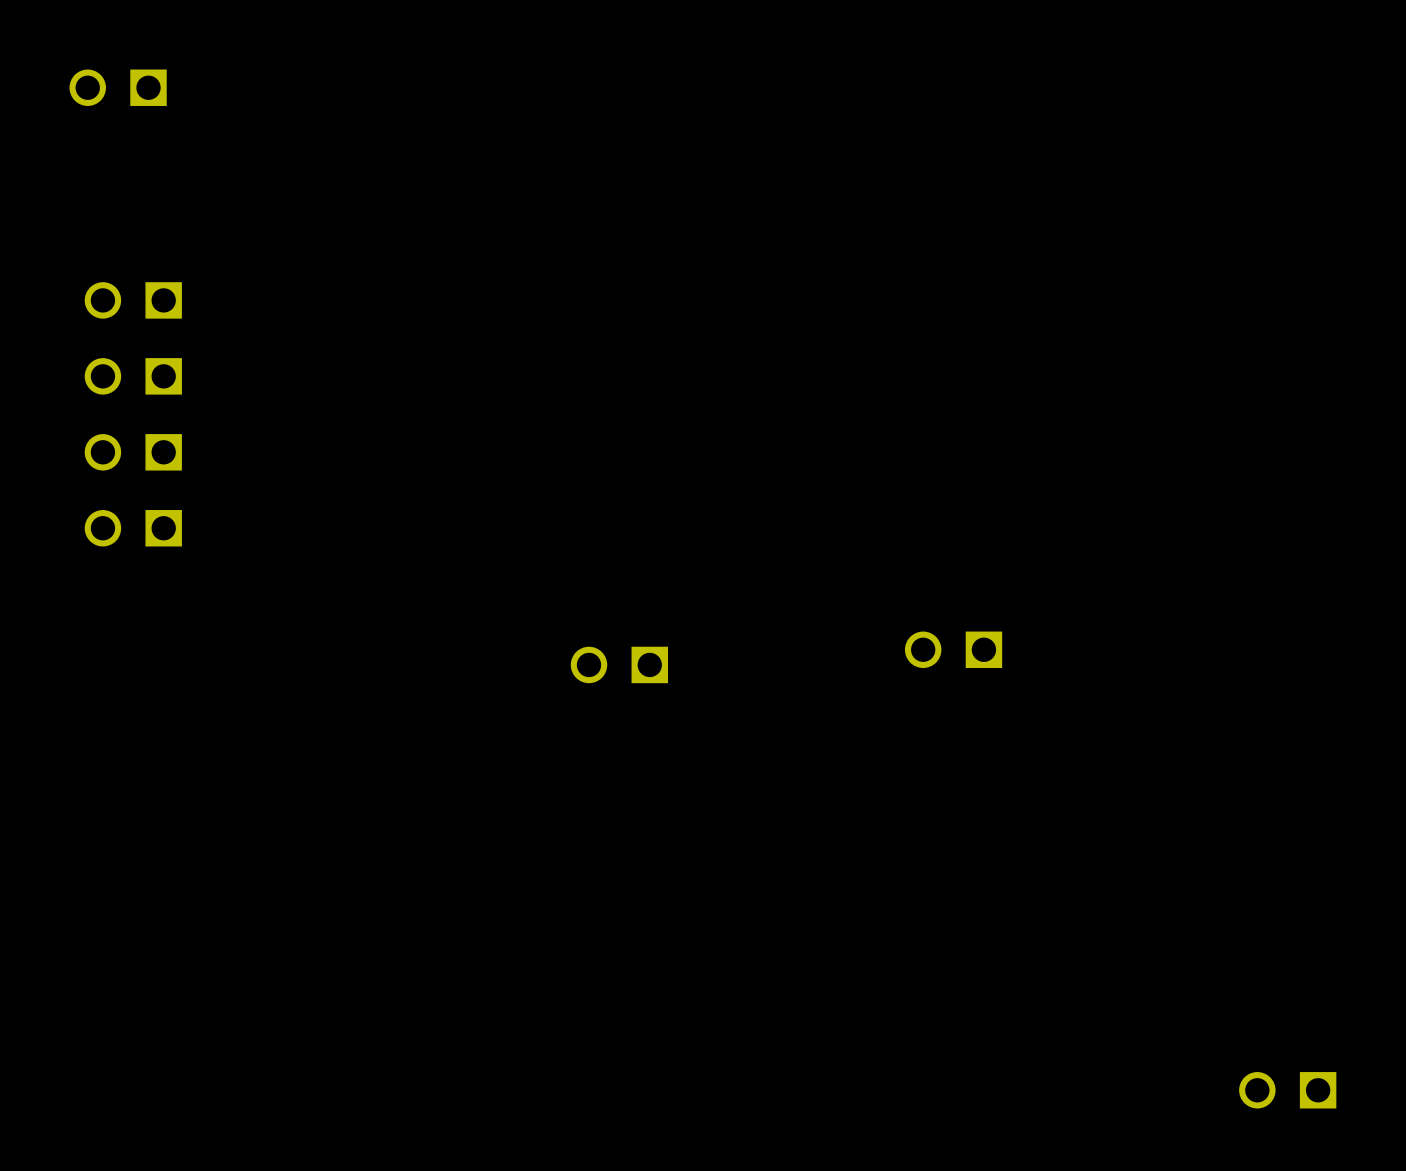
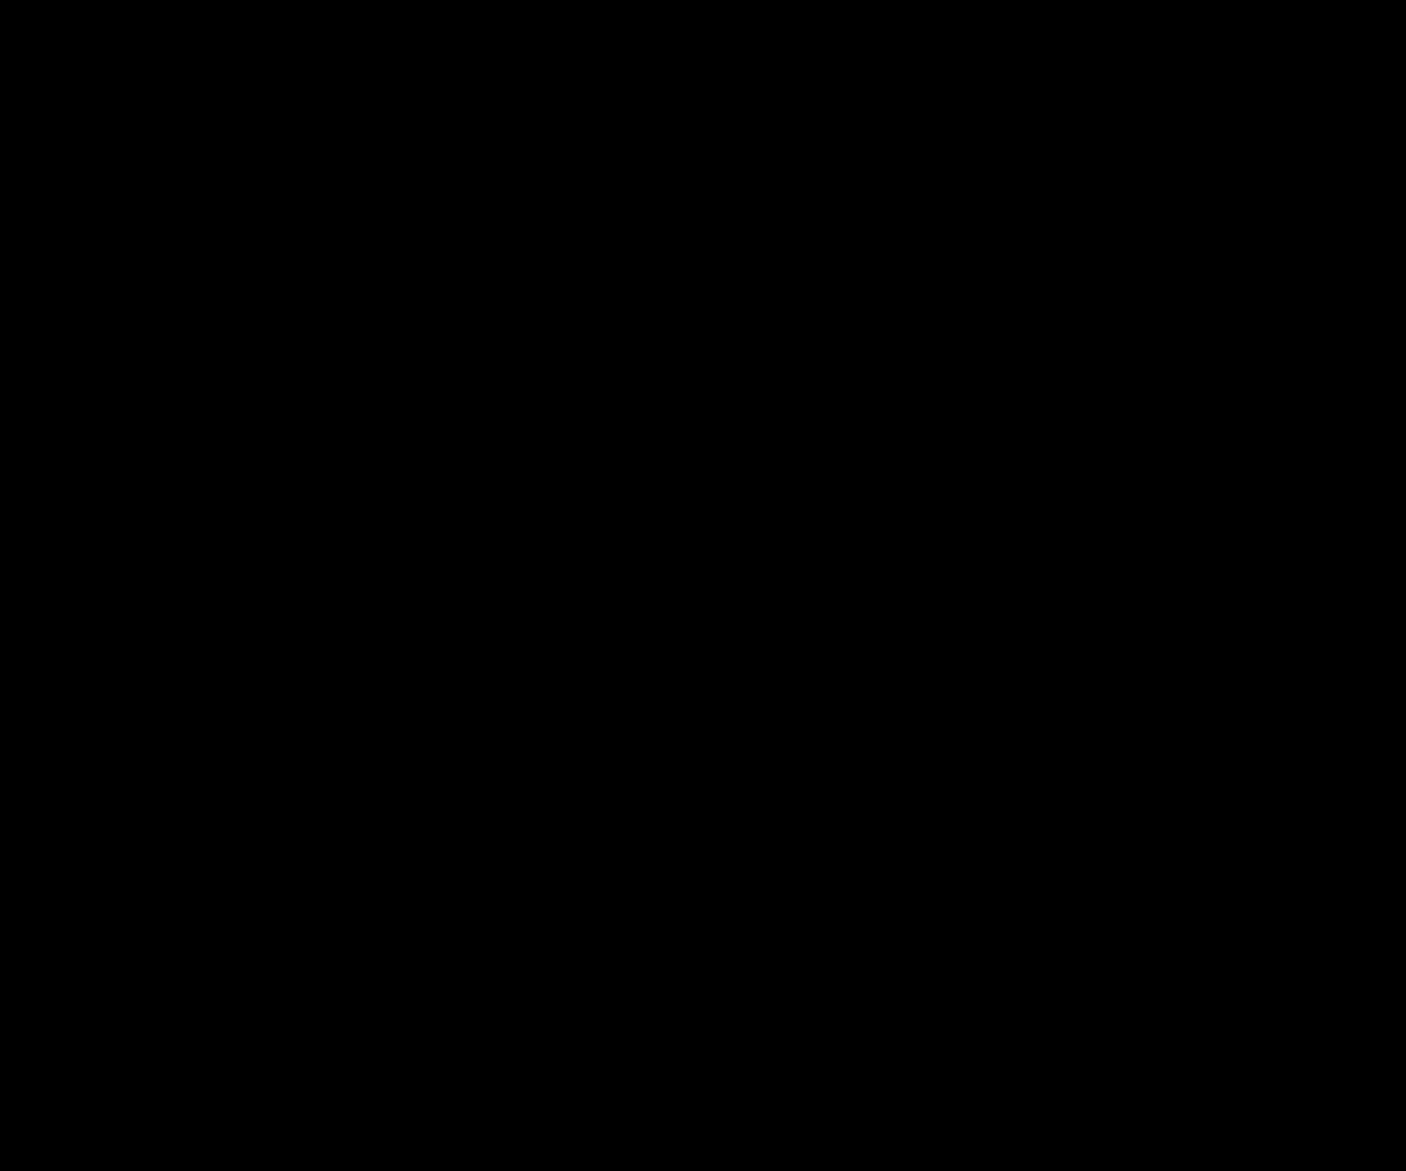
part: (118, 87) -> none
part: (133, 300) -> none
part: (133, 376) -> none
part: (133, 452) -> none
part: (133, 528) -> none
part: (953, 649) -> none
part: (619, 664) -> none
part: (1287, 1090) -> none

